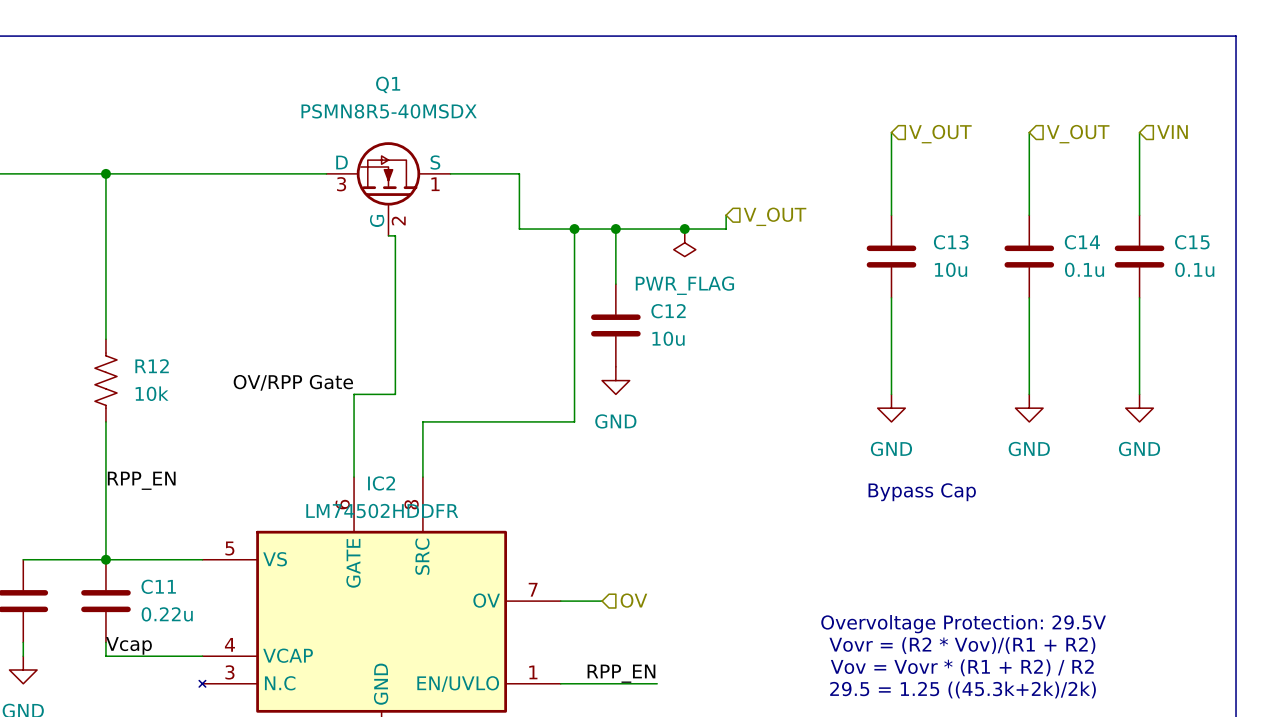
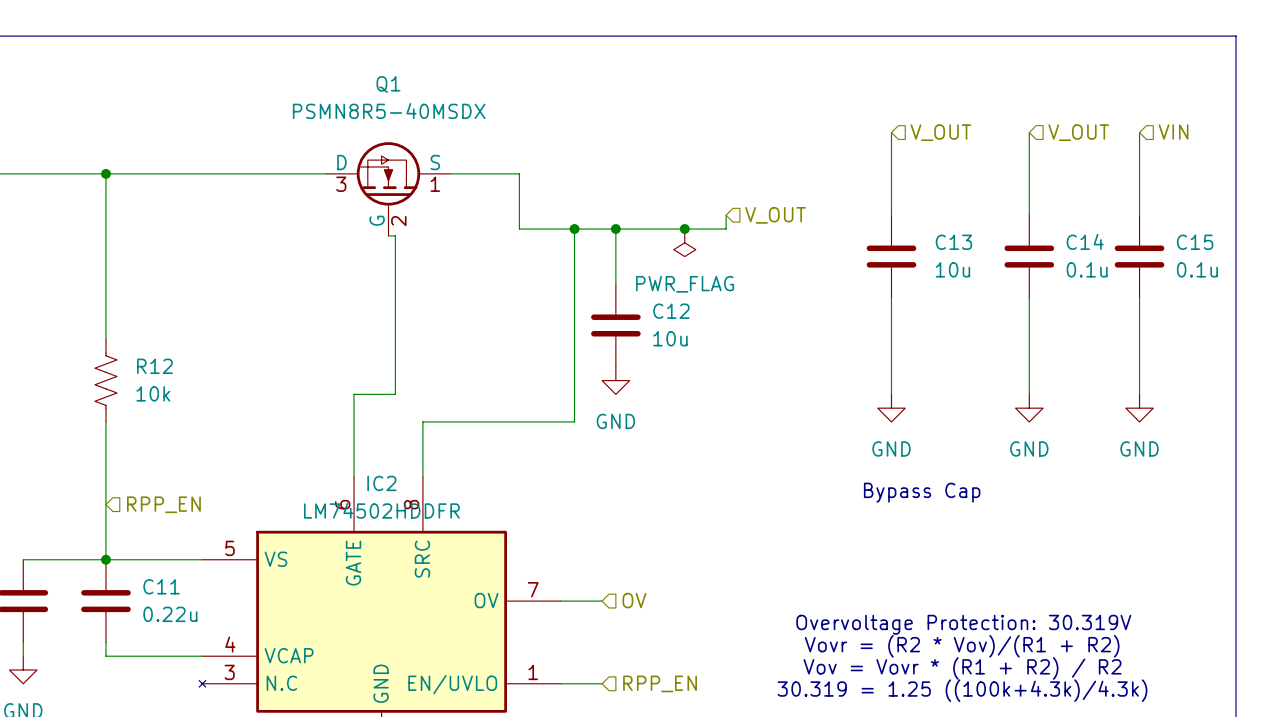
label: OV/RPP Gate (293, 382) -> none
label: RPP_EN (141, 480) -> none
hierarchical label: none -> RPP_EN (163, 504)
text: Overvoltage Protection: 29.5V (963, 624) -> Overvoltage Protection: 30.319V (963, 624)
label: Vcap (128, 645) -> none
label: RPP_EN (621, 673) -> none
wire: (602, 683) (657, 683) -> none
hierarchical label: none -> RPP_EN (660, 683)
text: 29.5 = 1.25 ((45.3k+2k)/2k) (963, 689) -> 30.319 = 1.25 ((100k+4.3k)/4.3k) (962, 690)

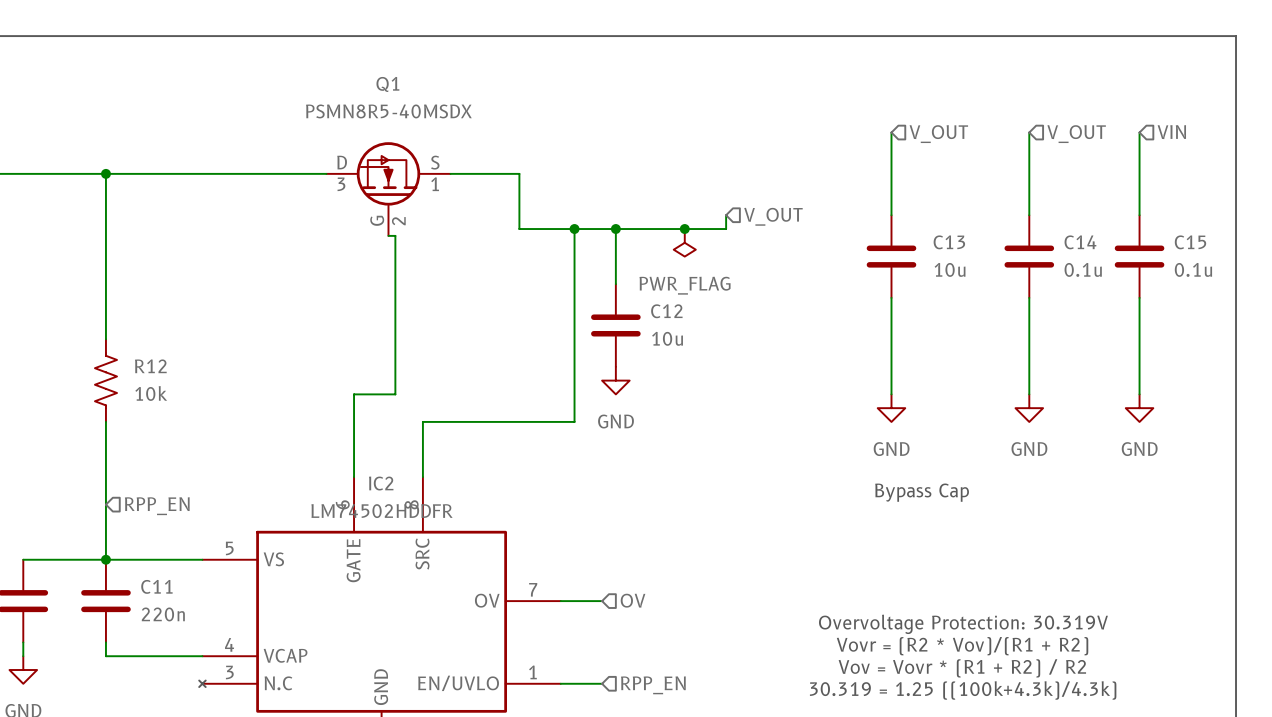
C11 value: 0.22u (170, 614) -> 220n (163, 614)

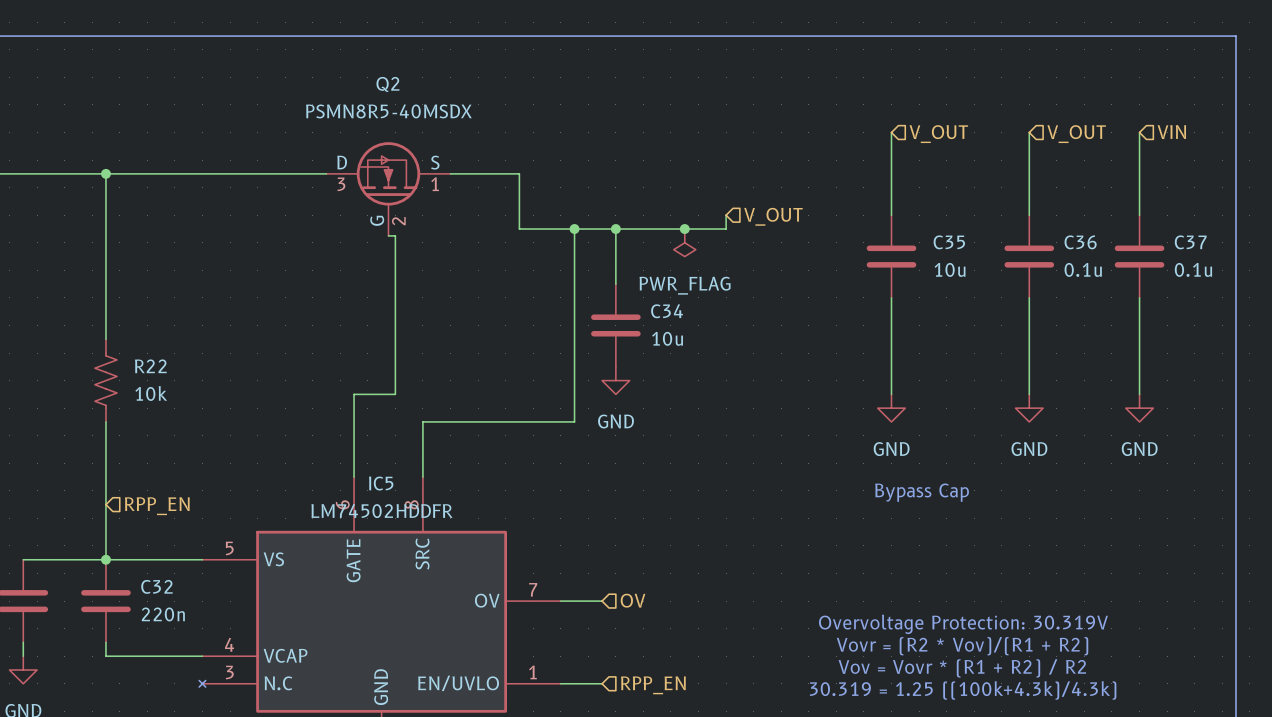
Q1 name: Q1 (387, 84) -> Q2 (387, 84)
C13 name: C13 (949, 242) -> C35 (949, 242)
C14 name: C14 (1080, 242) -> C36 (1080, 242)
C15 name: C15 (1190, 242) -> C37 (1190, 242)
C12 name: C12 (666, 311) -> C34 (667, 311)
R12 name: R12 (150, 366) -> R22 (150, 366)
IC2 name: IC2 (381, 483) -> IC5 (381, 483)
C11 name: C11 (156, 586) -> C32 (156, 586)

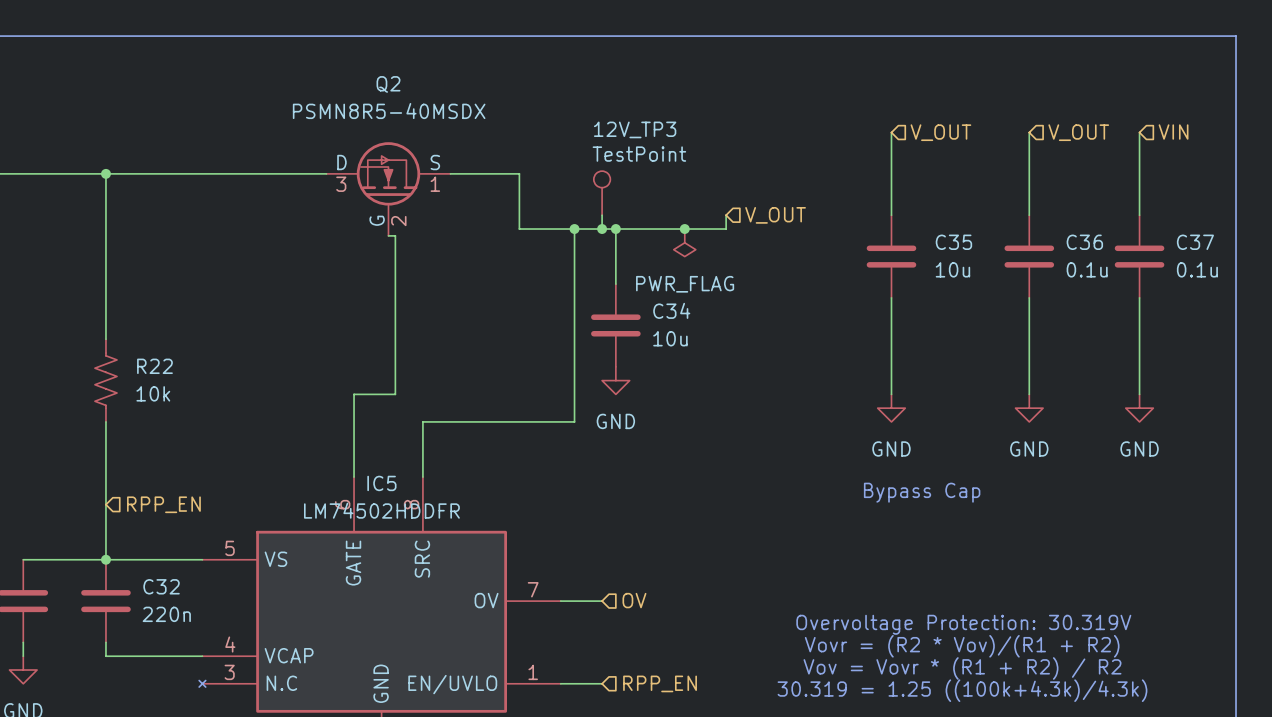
12V_TP3: none -> TestPoint (602, 193)
wire: none -> (602, 215) (602, 229)
junction: none -> (602, 229)

